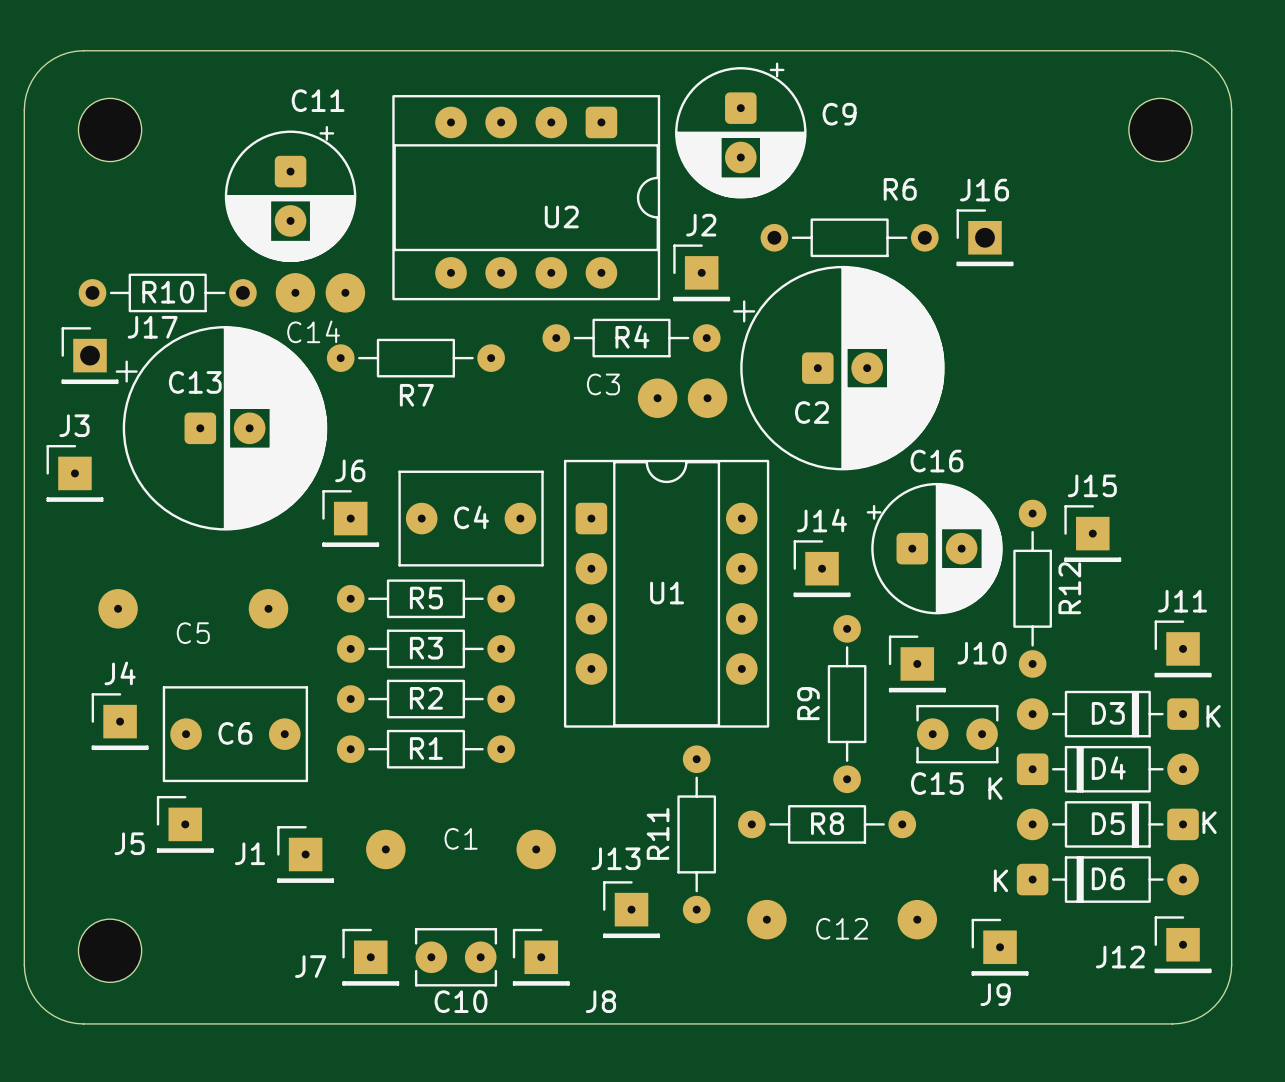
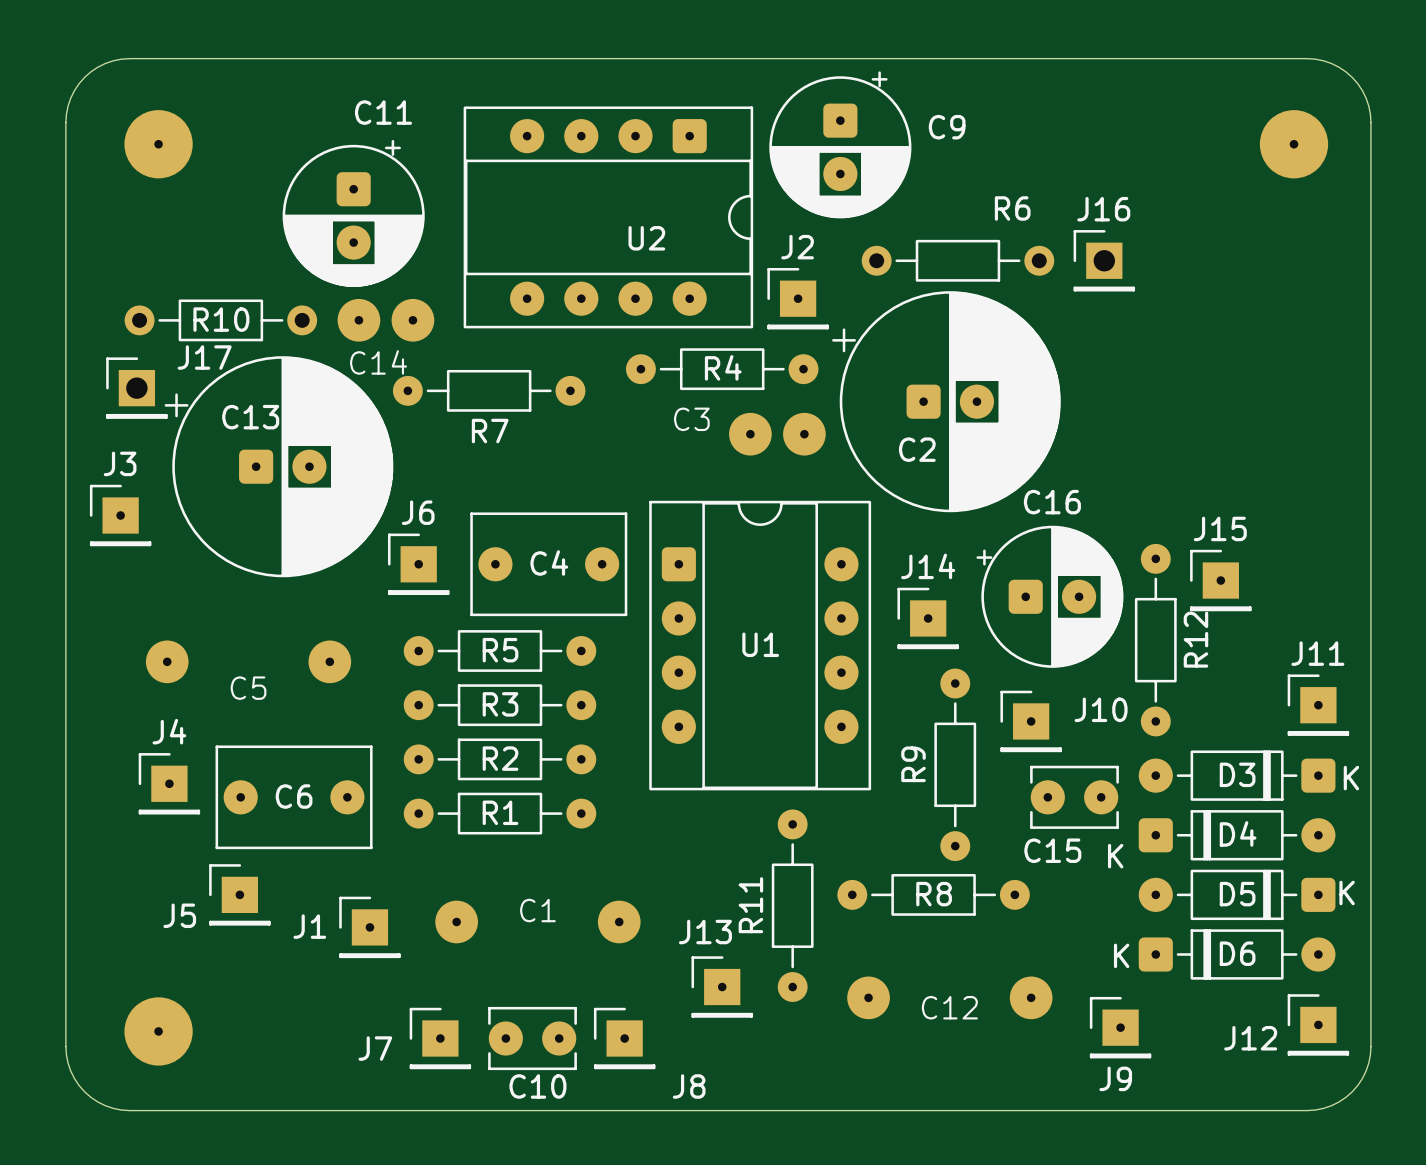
part footprint: [78, 98, 142, 162] -> [124, 110, 193, 179]
part footprint: [1128, 98, 1193, 162] -> [1259, 110, 1329, 179]
part footprint: [78, 919, 142, 983] -> [124, 997, 193, 1066]

